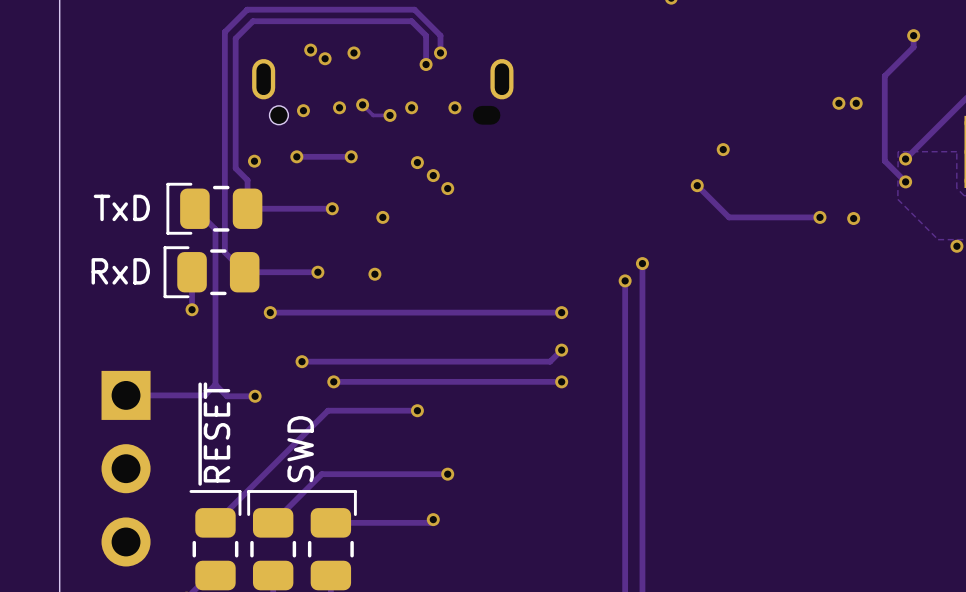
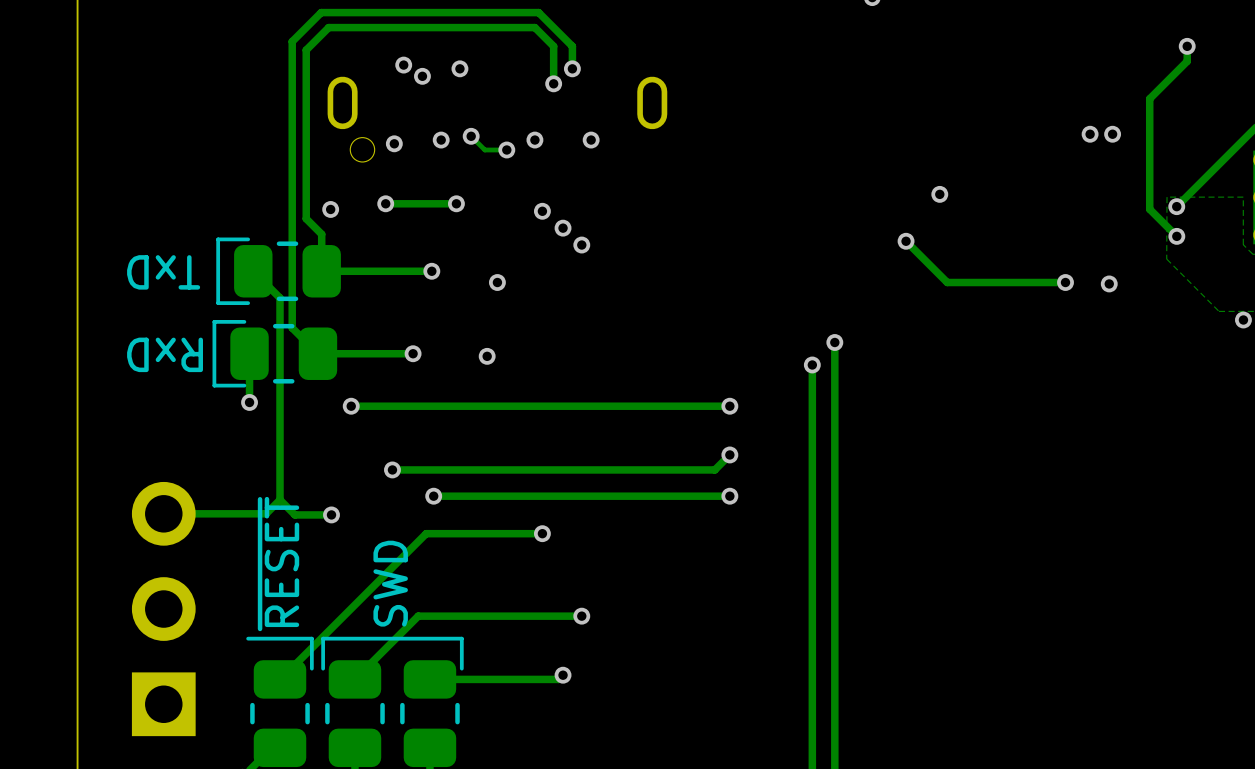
text rotation: 0° (121, 207) -> 180° (163, 272)
text rotation: 0° (120, 271) -> 180° (165, 354)
part rotation: 0° (126, 468) -> 180° (163, 609)

